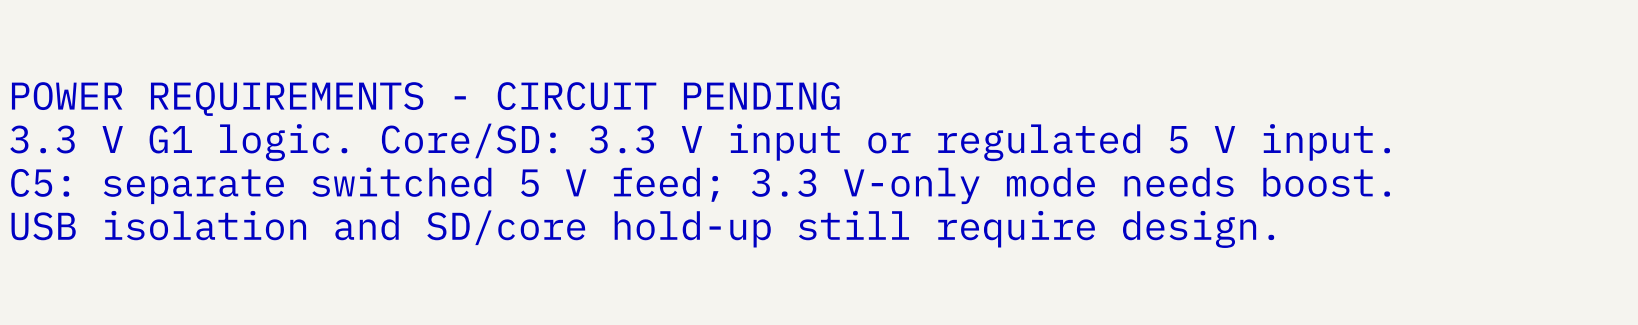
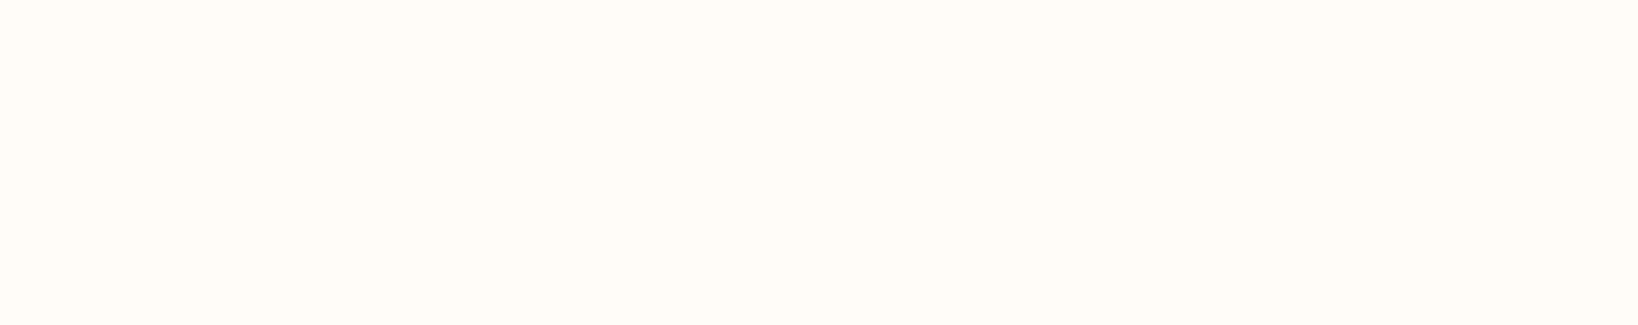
text: POWER REQUIREMENTS - CIRCUIT PENDING (425, 99) -> none
text: 3.3 V G1 logic. Core/SD: 3.3 V input or regulated 5 V input. (700, 142) -> none
text: C5: separate switched 5 V feed; 3.3 V-only mode needs boost. (700, 185) -> none
text: USB isolation and SD/core hold-up still require design. (642, 229) -> none

